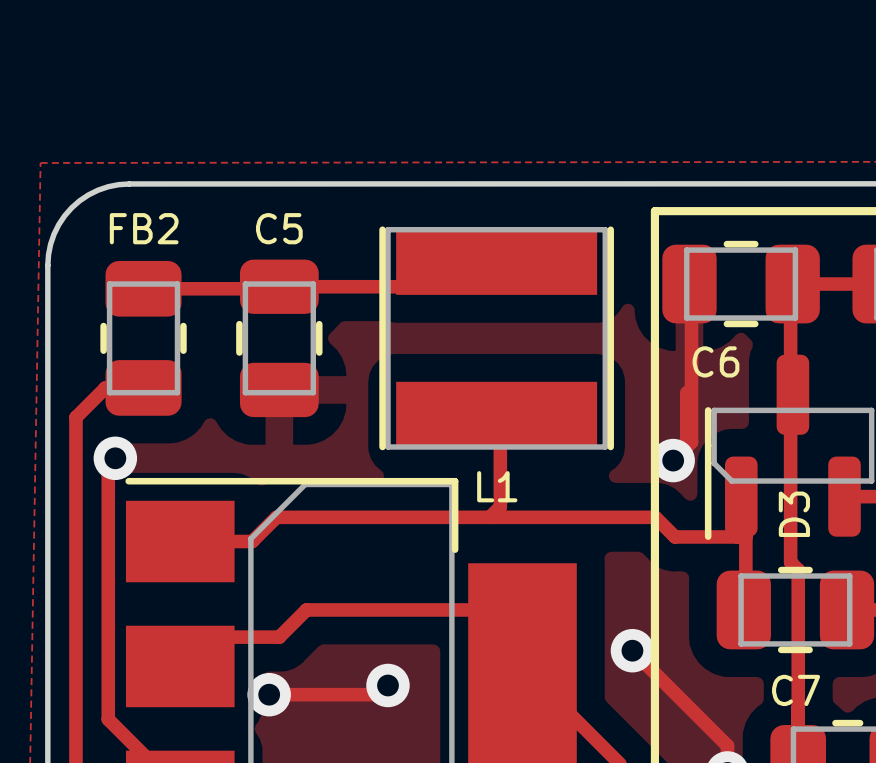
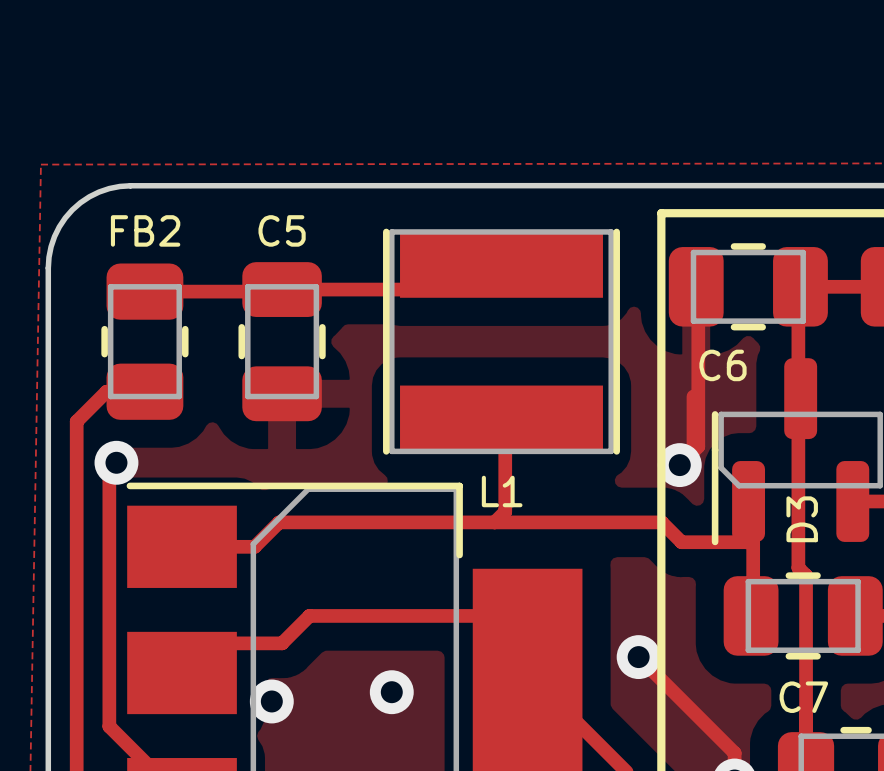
track: (387, 685) (378, 694) (269, 694) -> none

